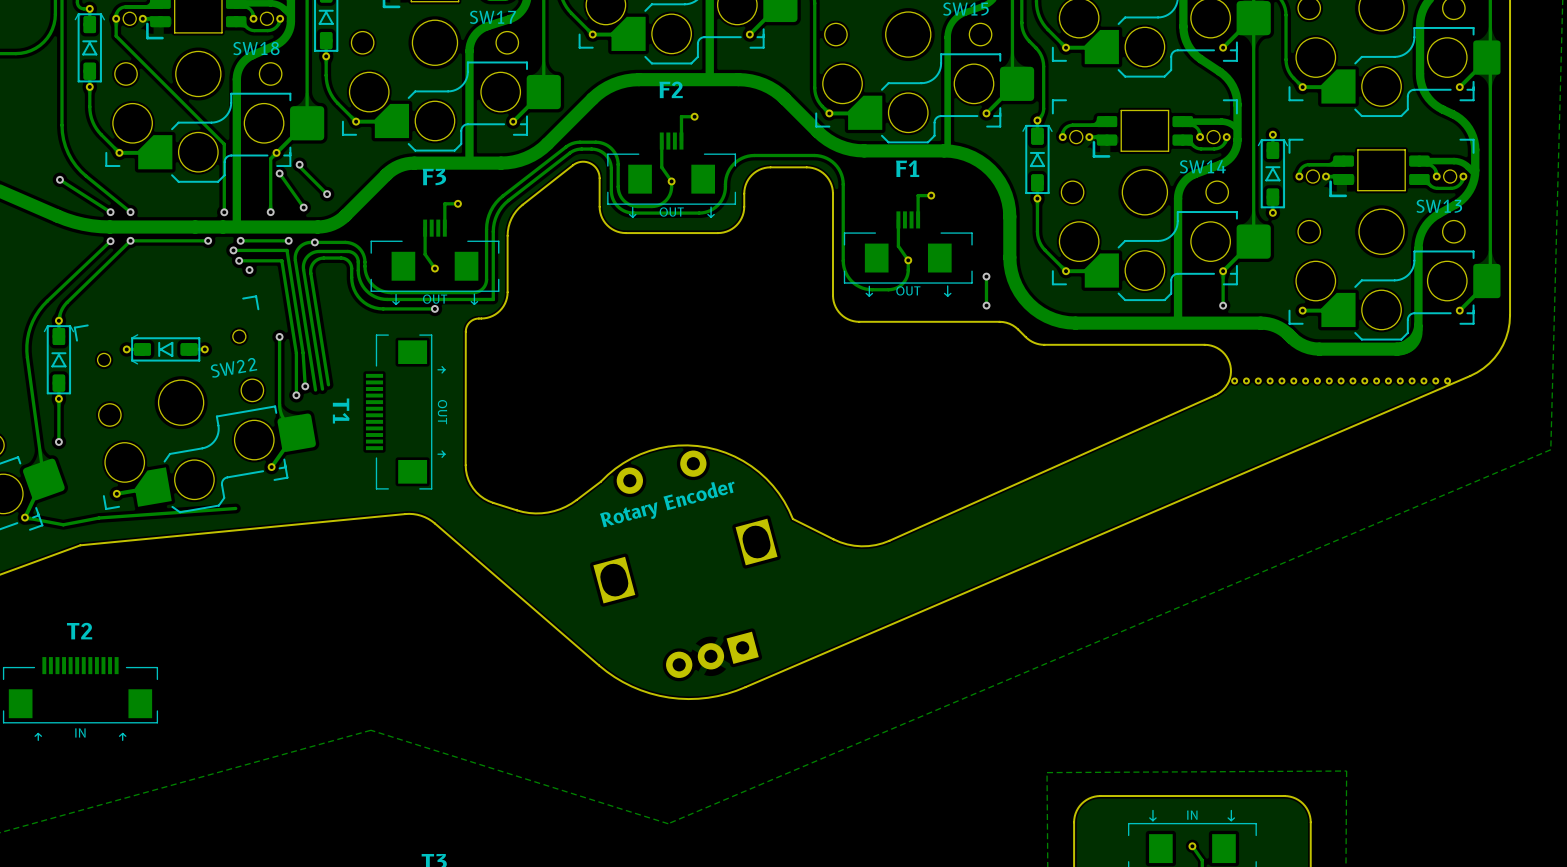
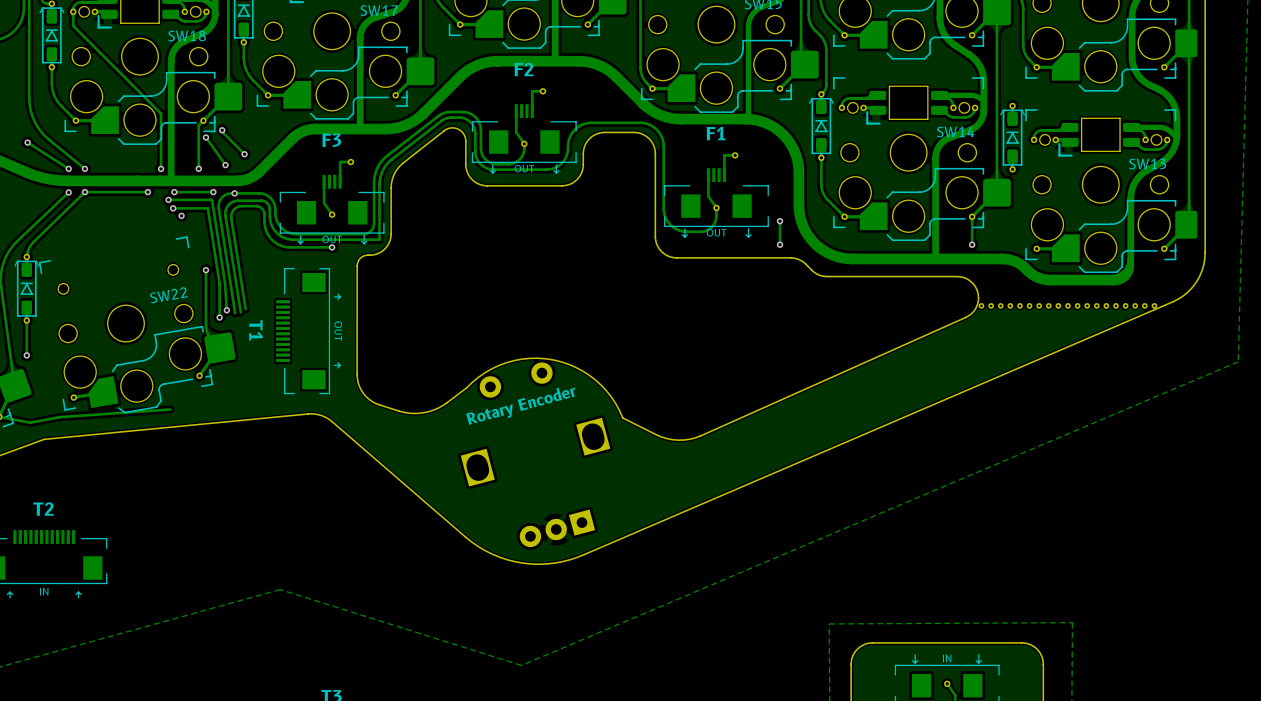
part: (165, 349) -> none

